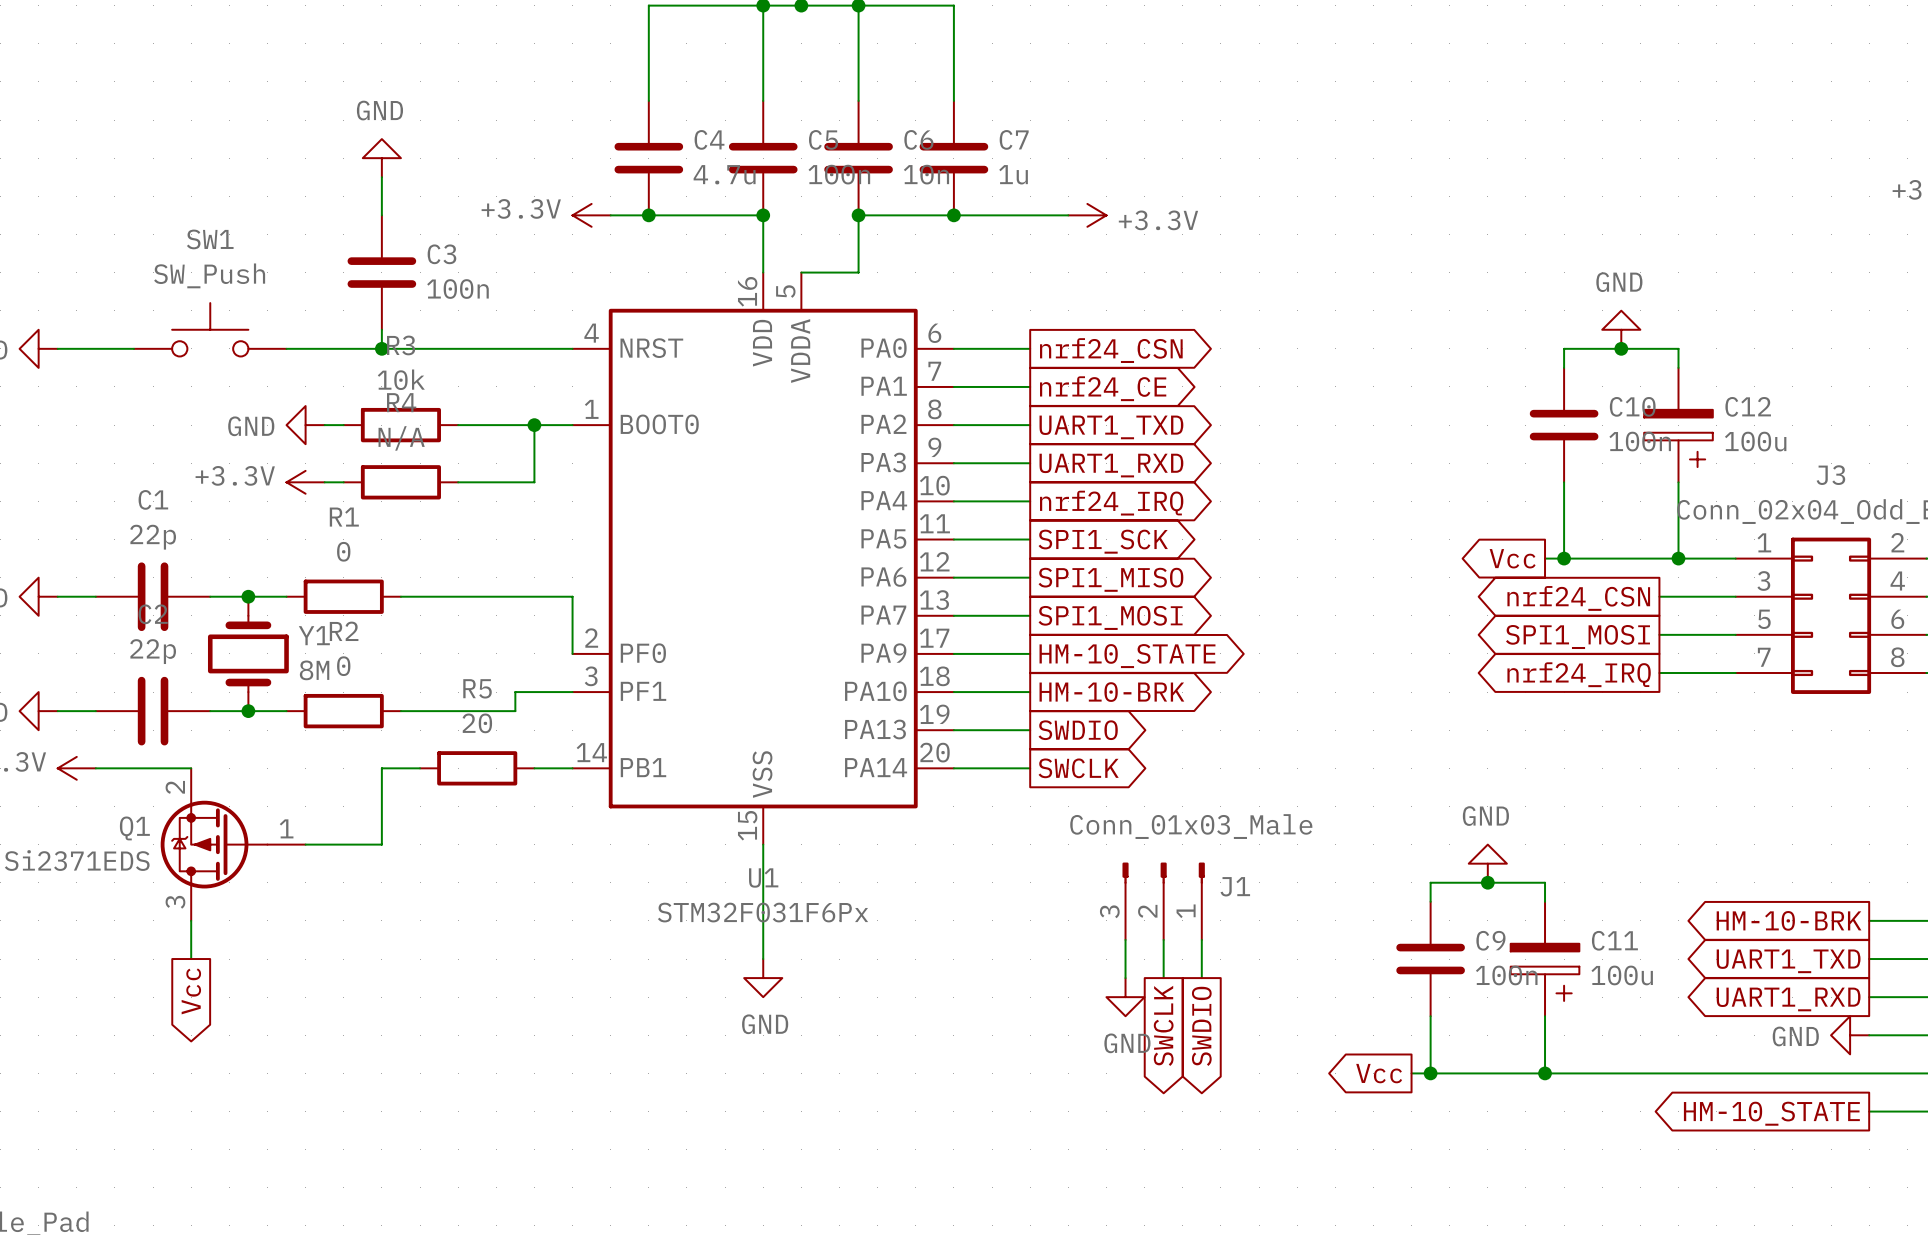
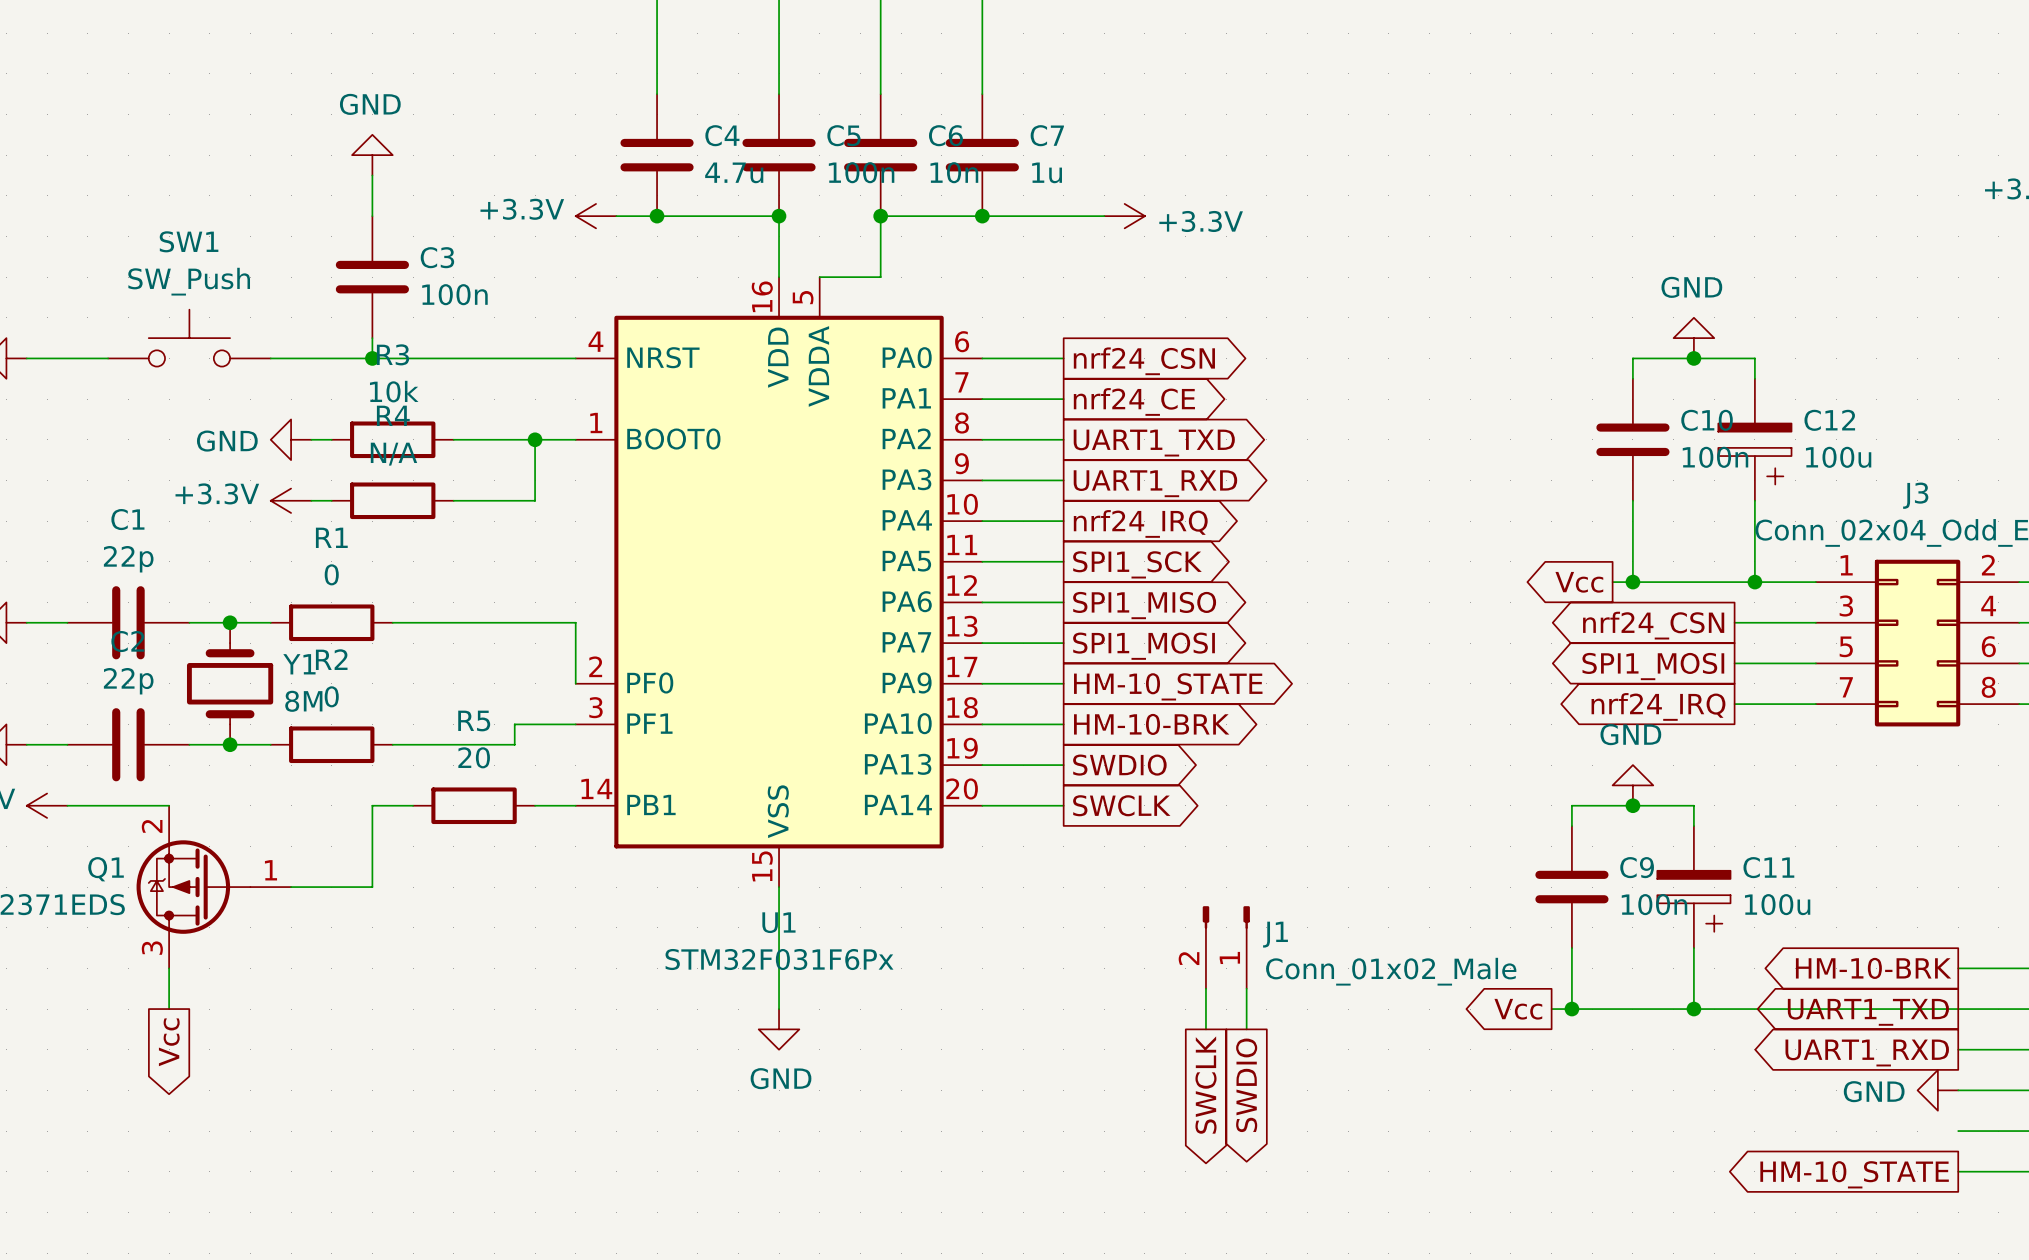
junction: none -> (1632, 805)
J1 value: Conn_01x03_Male (1191, 826) -> Conn_01x02_Male (1391, 971)
J1 symbol: [1122, 862, 1205, 940] -> [1202, 906, 1250, 989]
power symbol position: GND (1487, 863) -> GND (1632, 785)
junction: (1487, 882) -> none
wire: (1430, 901) (1430, 882) (1545, 882) (1545, 901) -> (1571, 826) (1571, 805) (1693, 805) (1693, 826)
wire: (1125, 939) (1125, 978) -> none
C9 position: (1430, 959) -> (1571, 887)
wire: none -> (1551, 1009) (1958, 1009)
junction: none -> (1571, 1009)
C11 position: (1545, 959) -> (1693, 887)
junction: none -> (1693, 1009)
power symbol: GND (1125, 997) -> none
wire: (1430, 1016) (1430, 1073) -> (1571, 948) (1571, 1009)
wire: (1545, 1016) (1545, 1073) -> (1693, 948) (1693, 1009)
global label position: Vcc (1379, 1073) -> Vcc (1518, 1009)
wire: (1411, 1073) (1869, 1073) -> none
junction: (1430, 1073) -> none
junction: (1545, 1073) -> none

